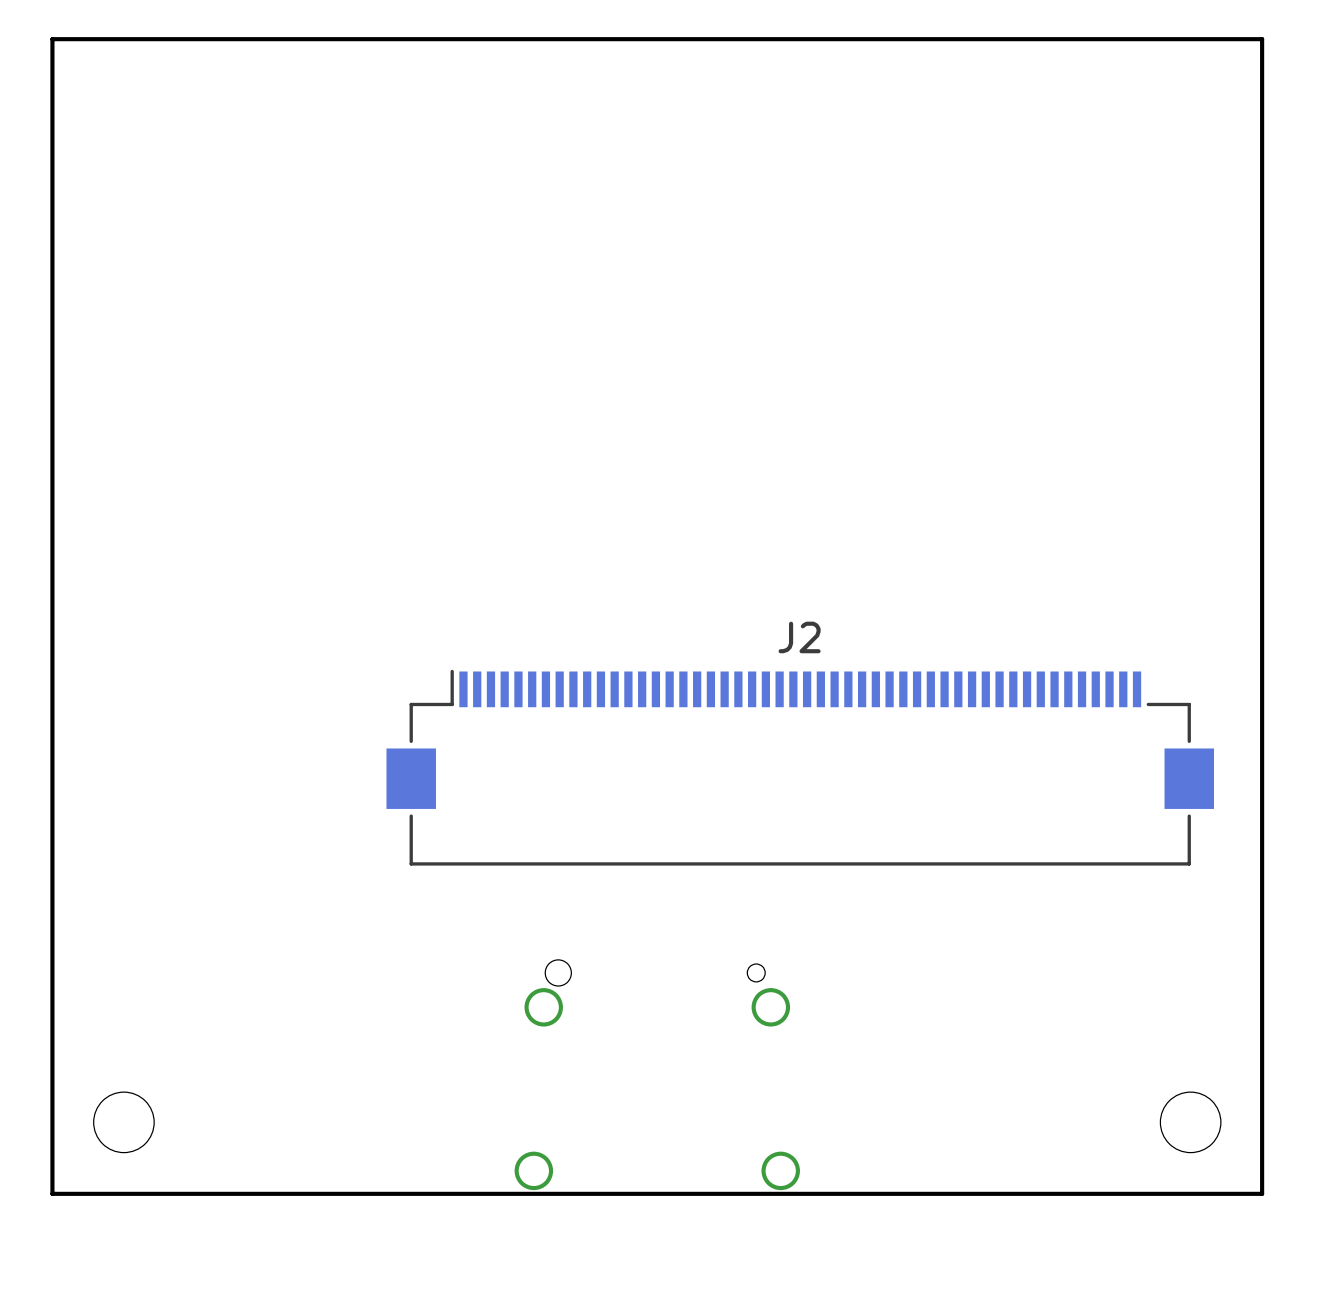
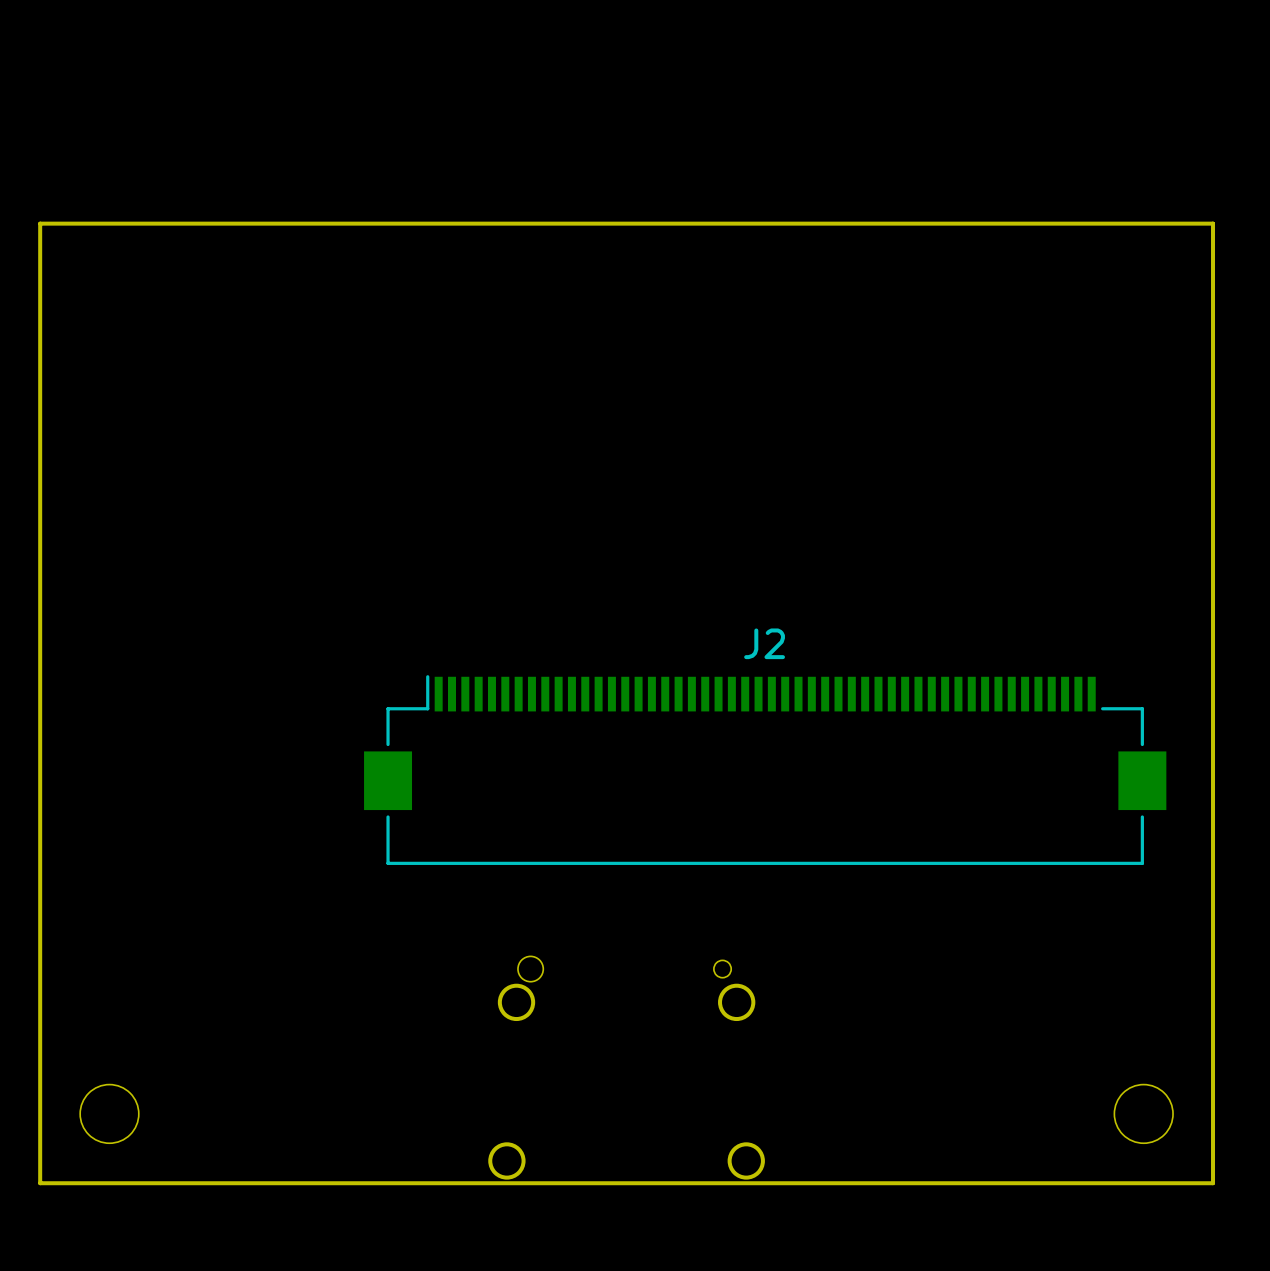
board edge: (1262, 204) (1262, 39) (52, 39) (52, 204) -> (1213, 223) (40, 223)

